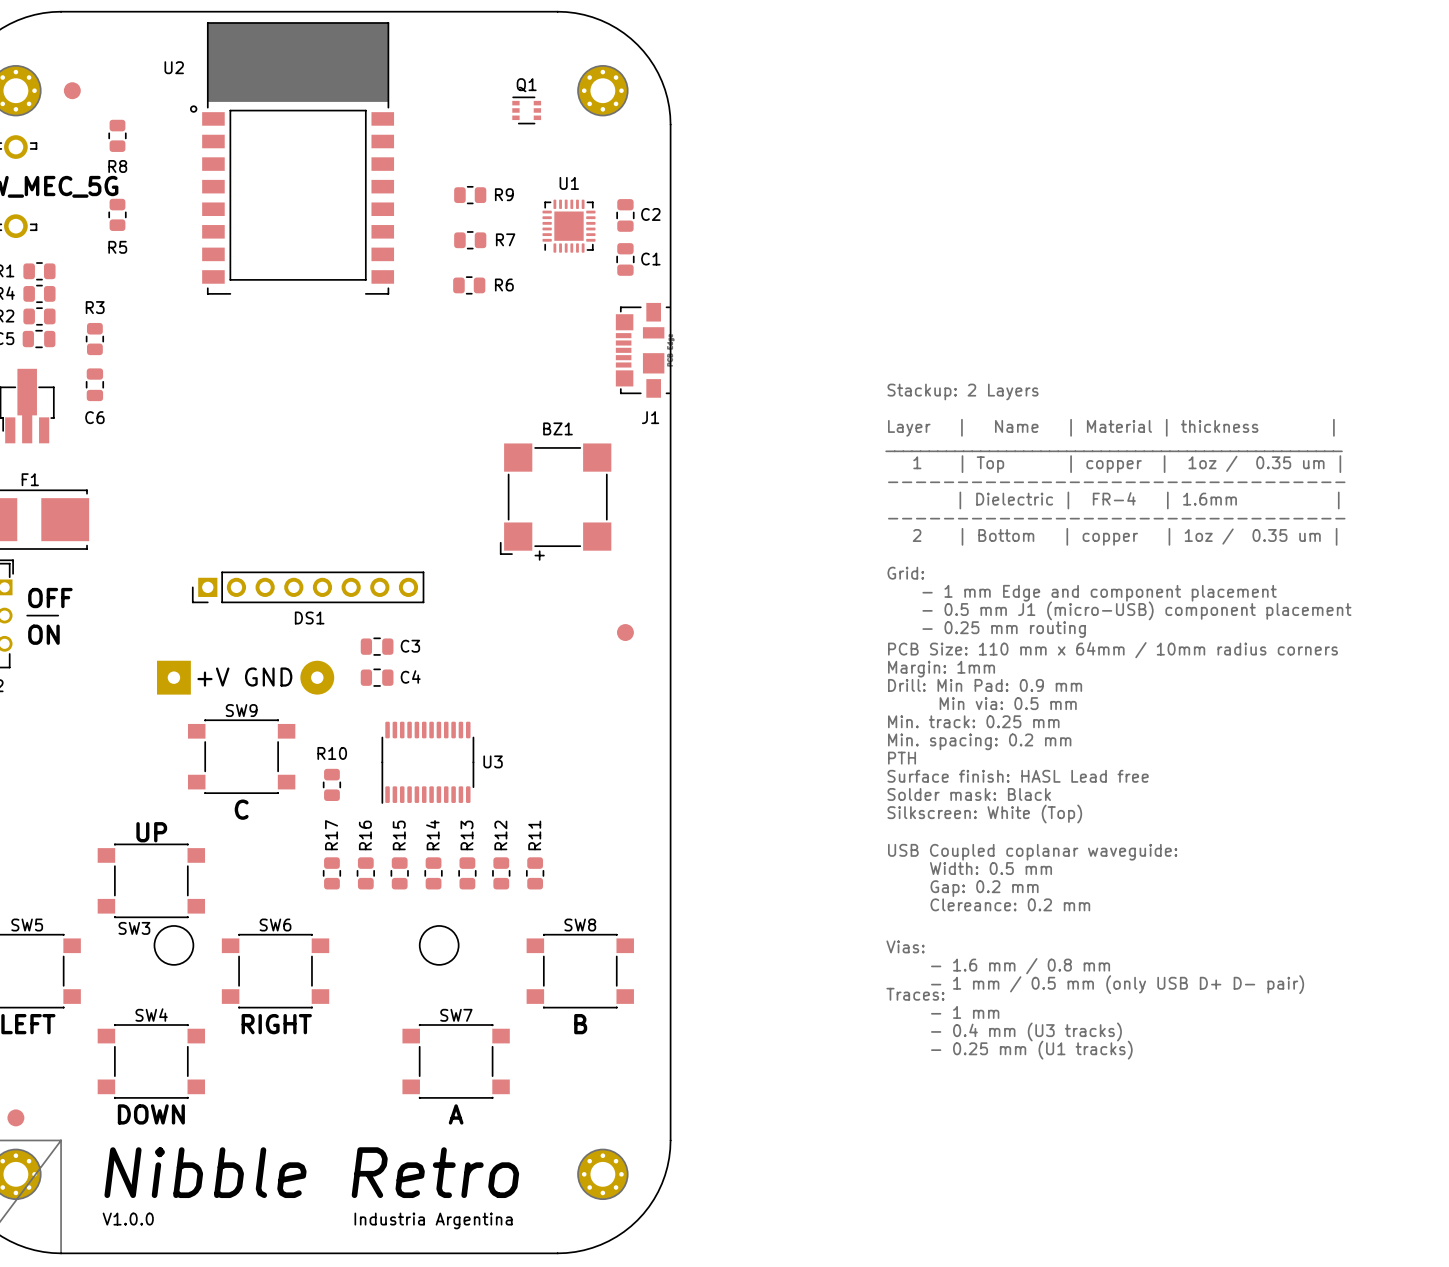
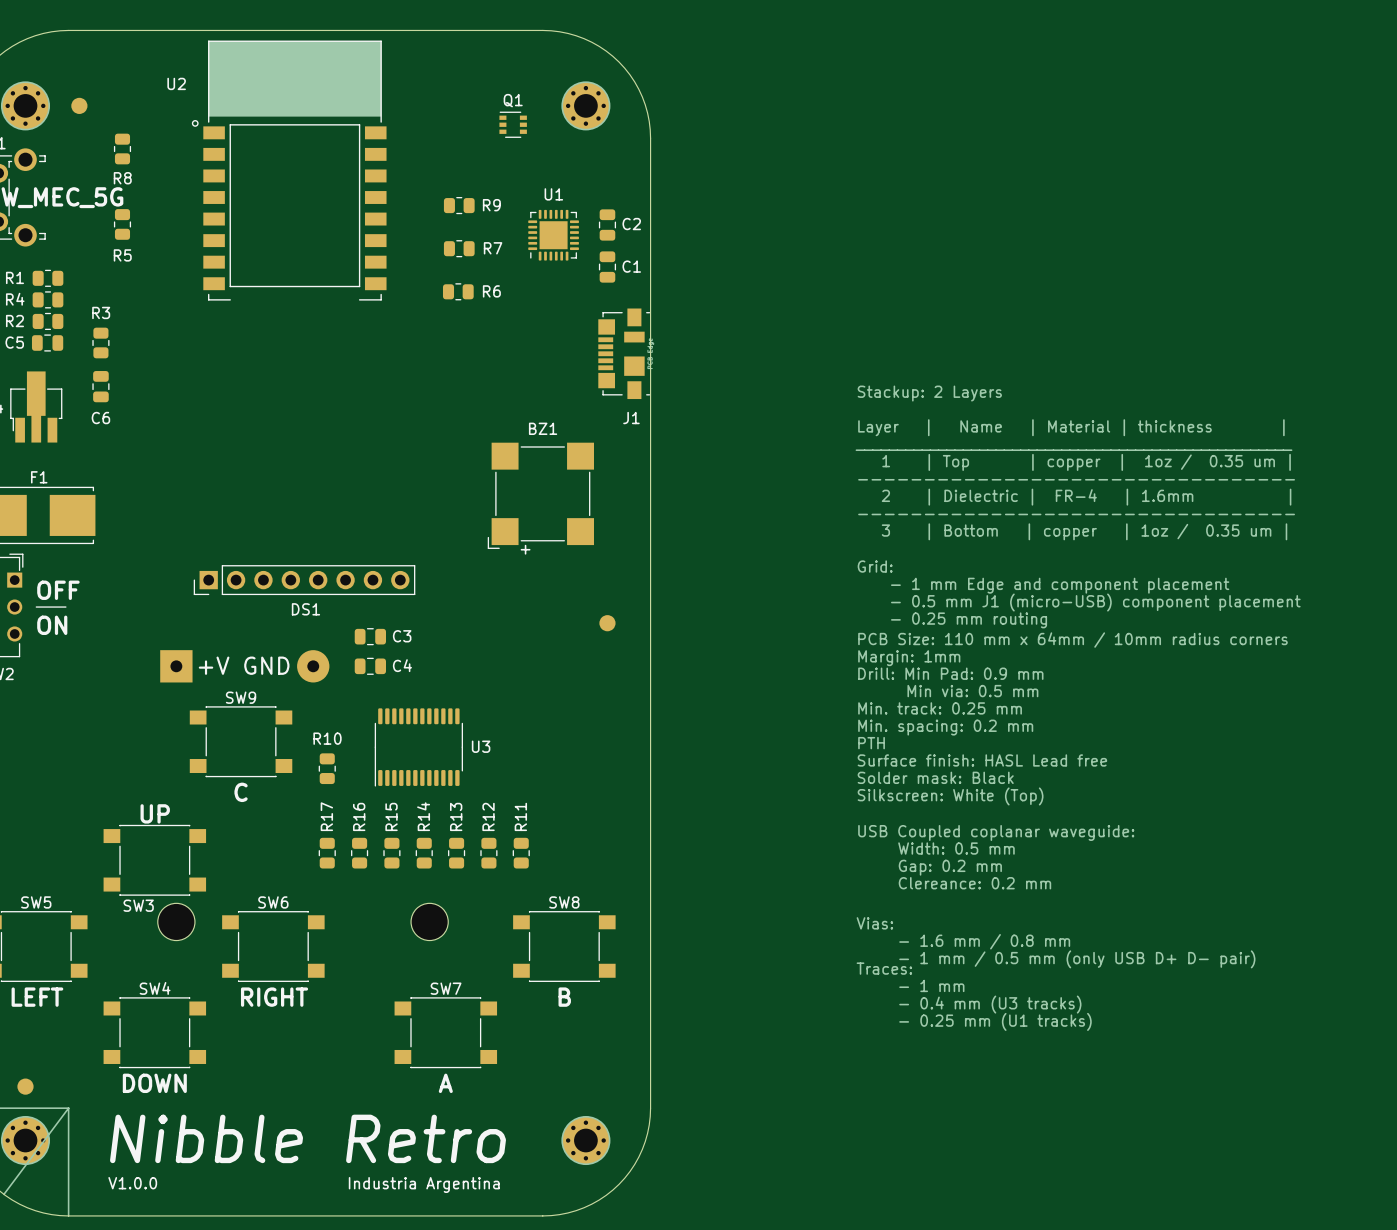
text: | Dielectric | FR-4 | 1.6mm | (1149, 500) -> 2 | Dielectric | FR-4 | 1.6mm | (1086, 497)
text: 2 | Bottom | copper | 1oz / 0.35 um | (1125, 536) -> 3 | Bottom | copper | 1oz / 0.35 um | (1084, 531)

